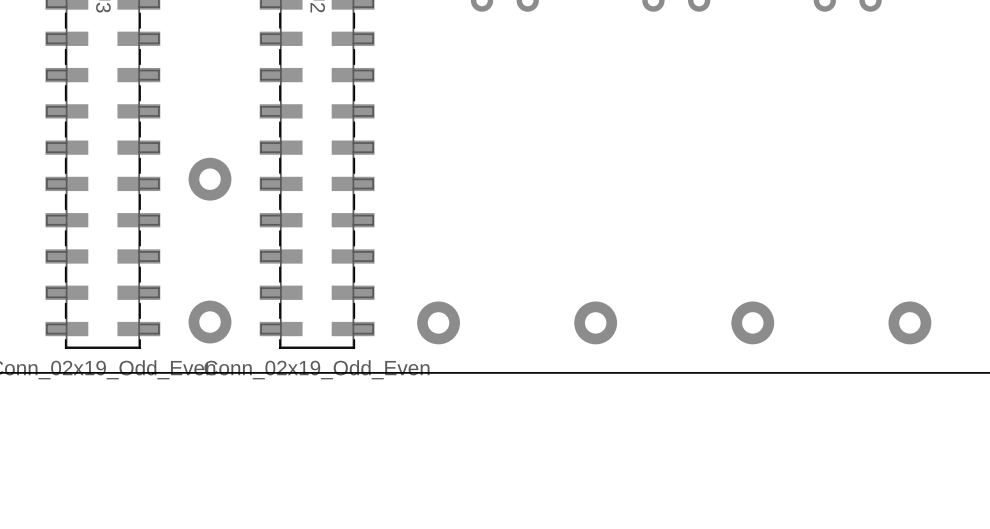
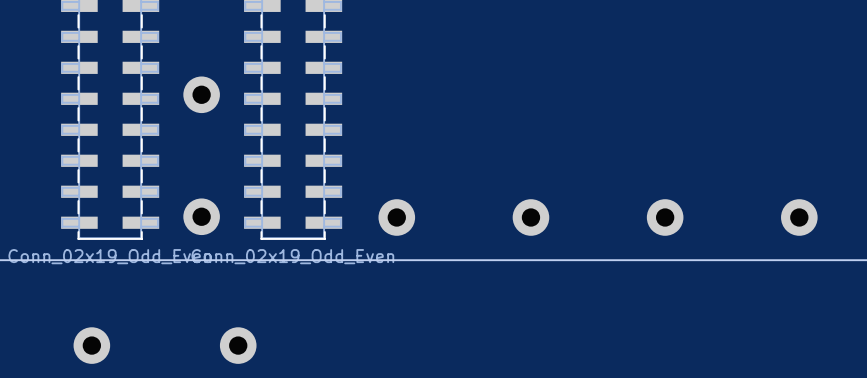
part: none -> (91, 345)
part: none -> (238, 345)

